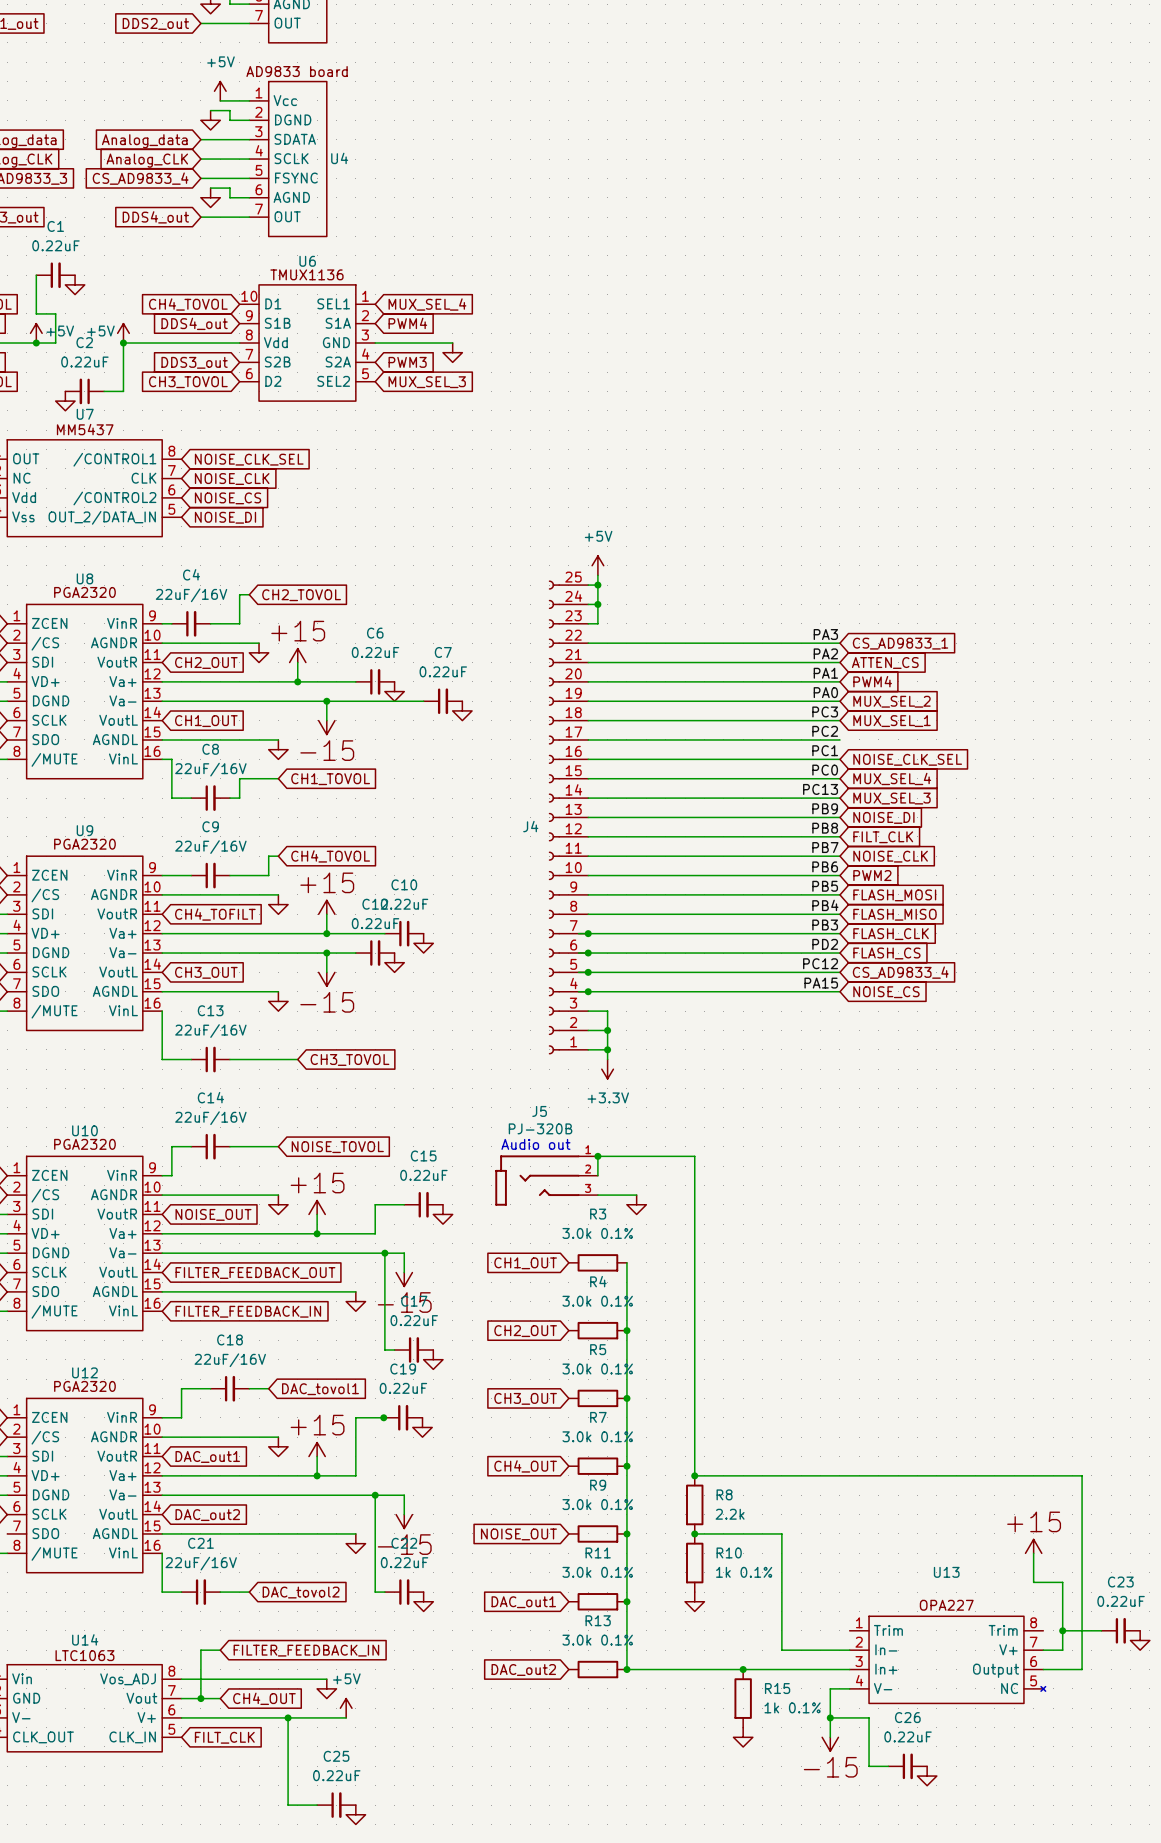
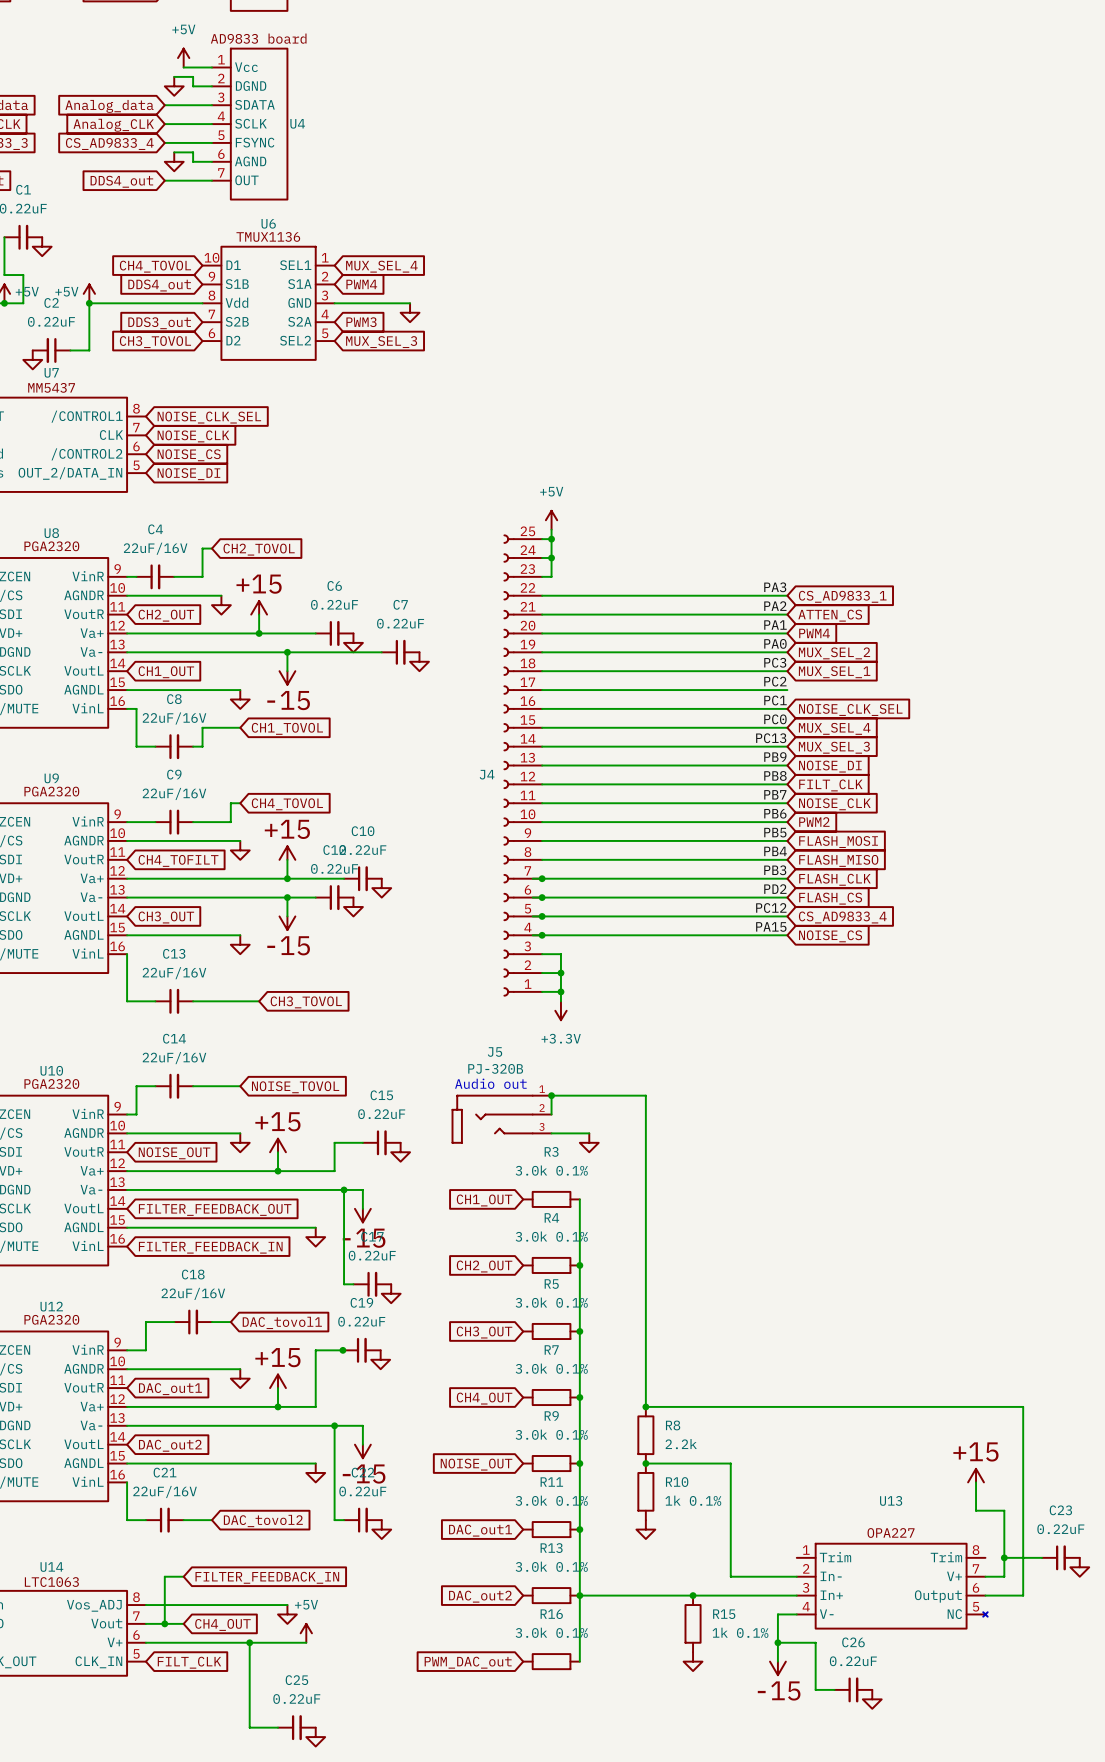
wire: none -> (579, 1595) (579, 1661)
global label: none -> PWM_DAC_out (468, 1662)
R16: none -> (551, 1661)

